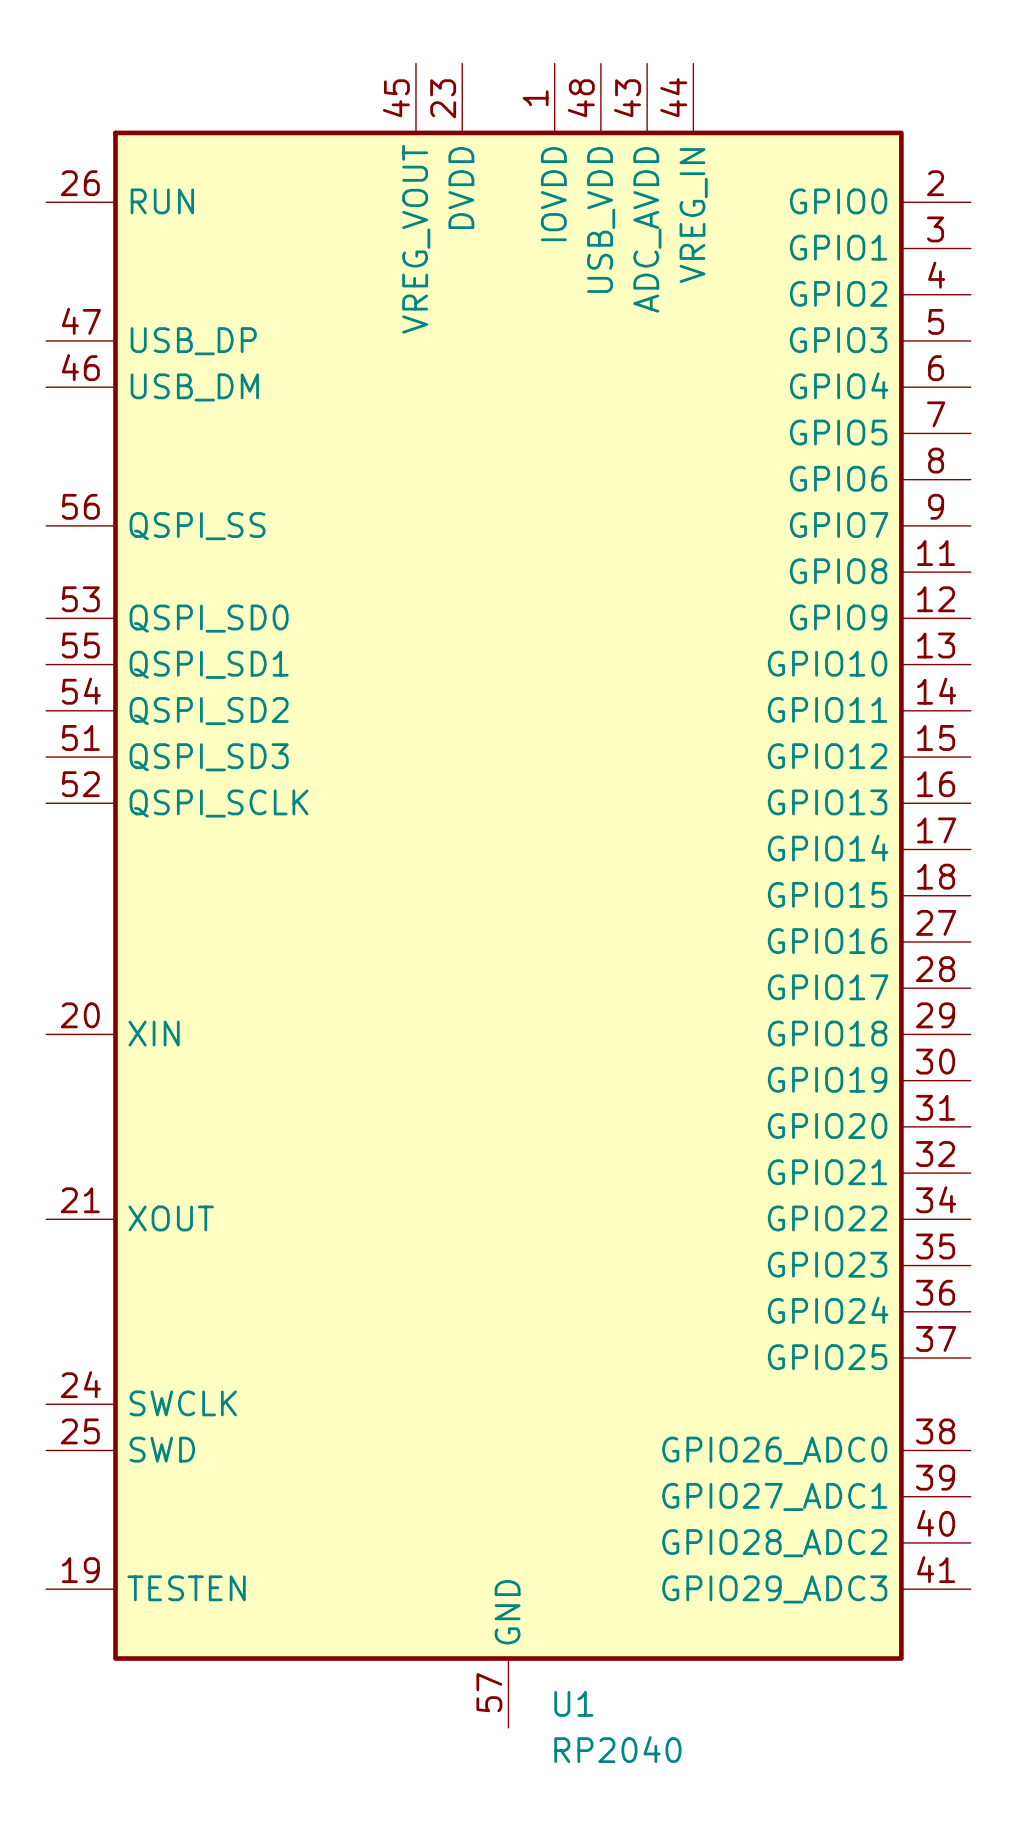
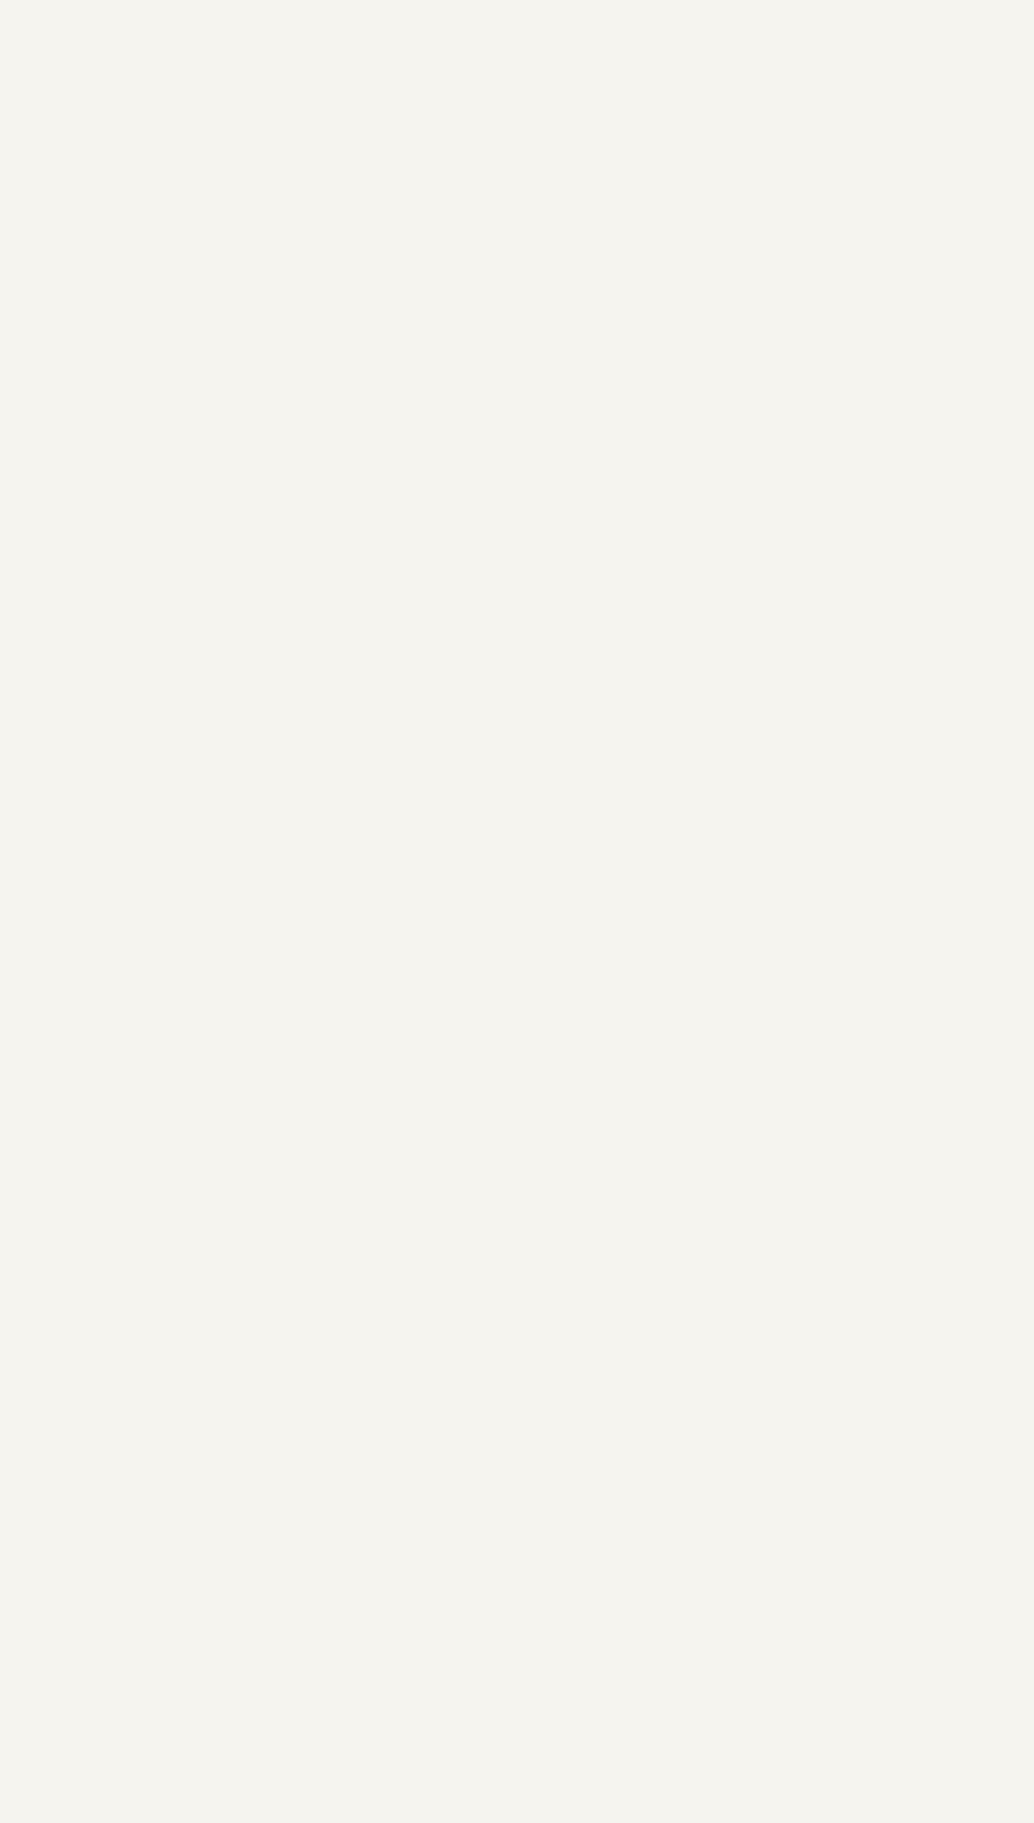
U1: RP2040 (508, 895) -> none

